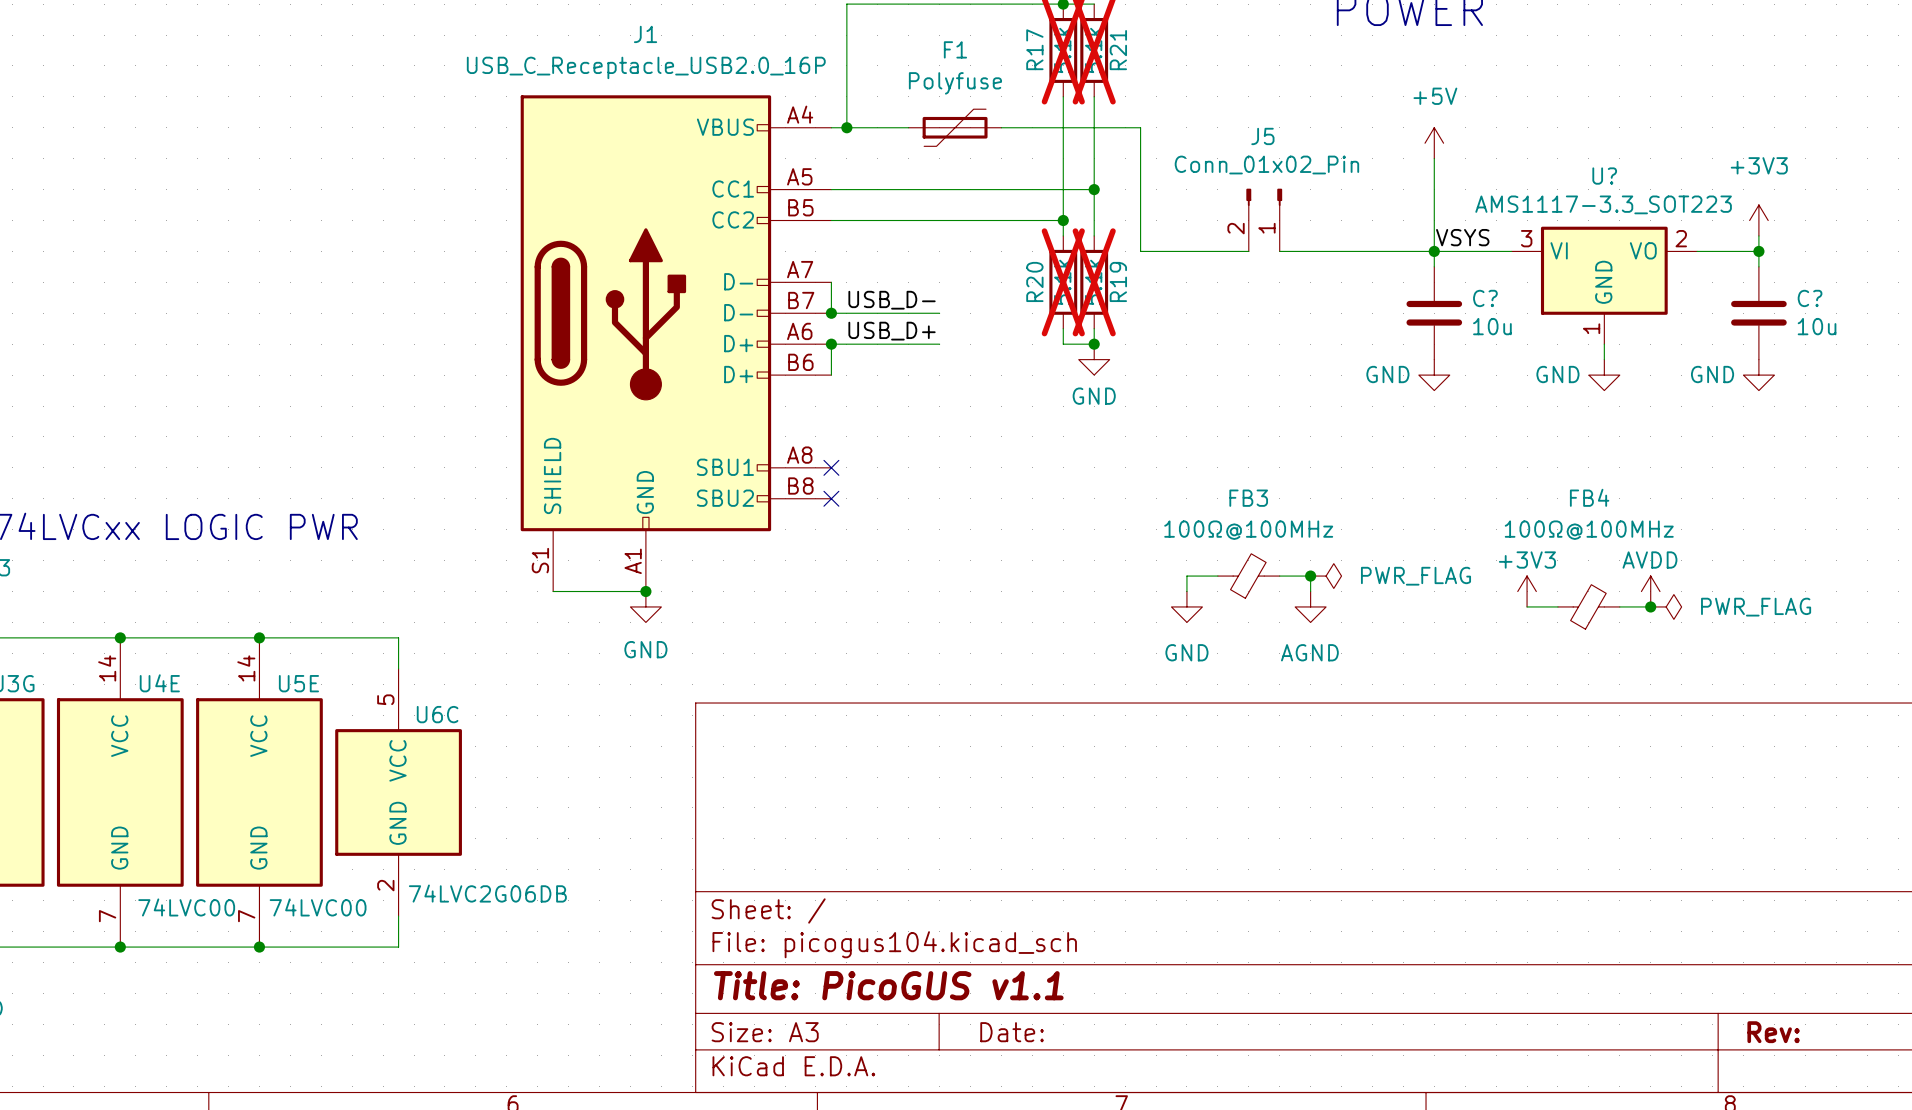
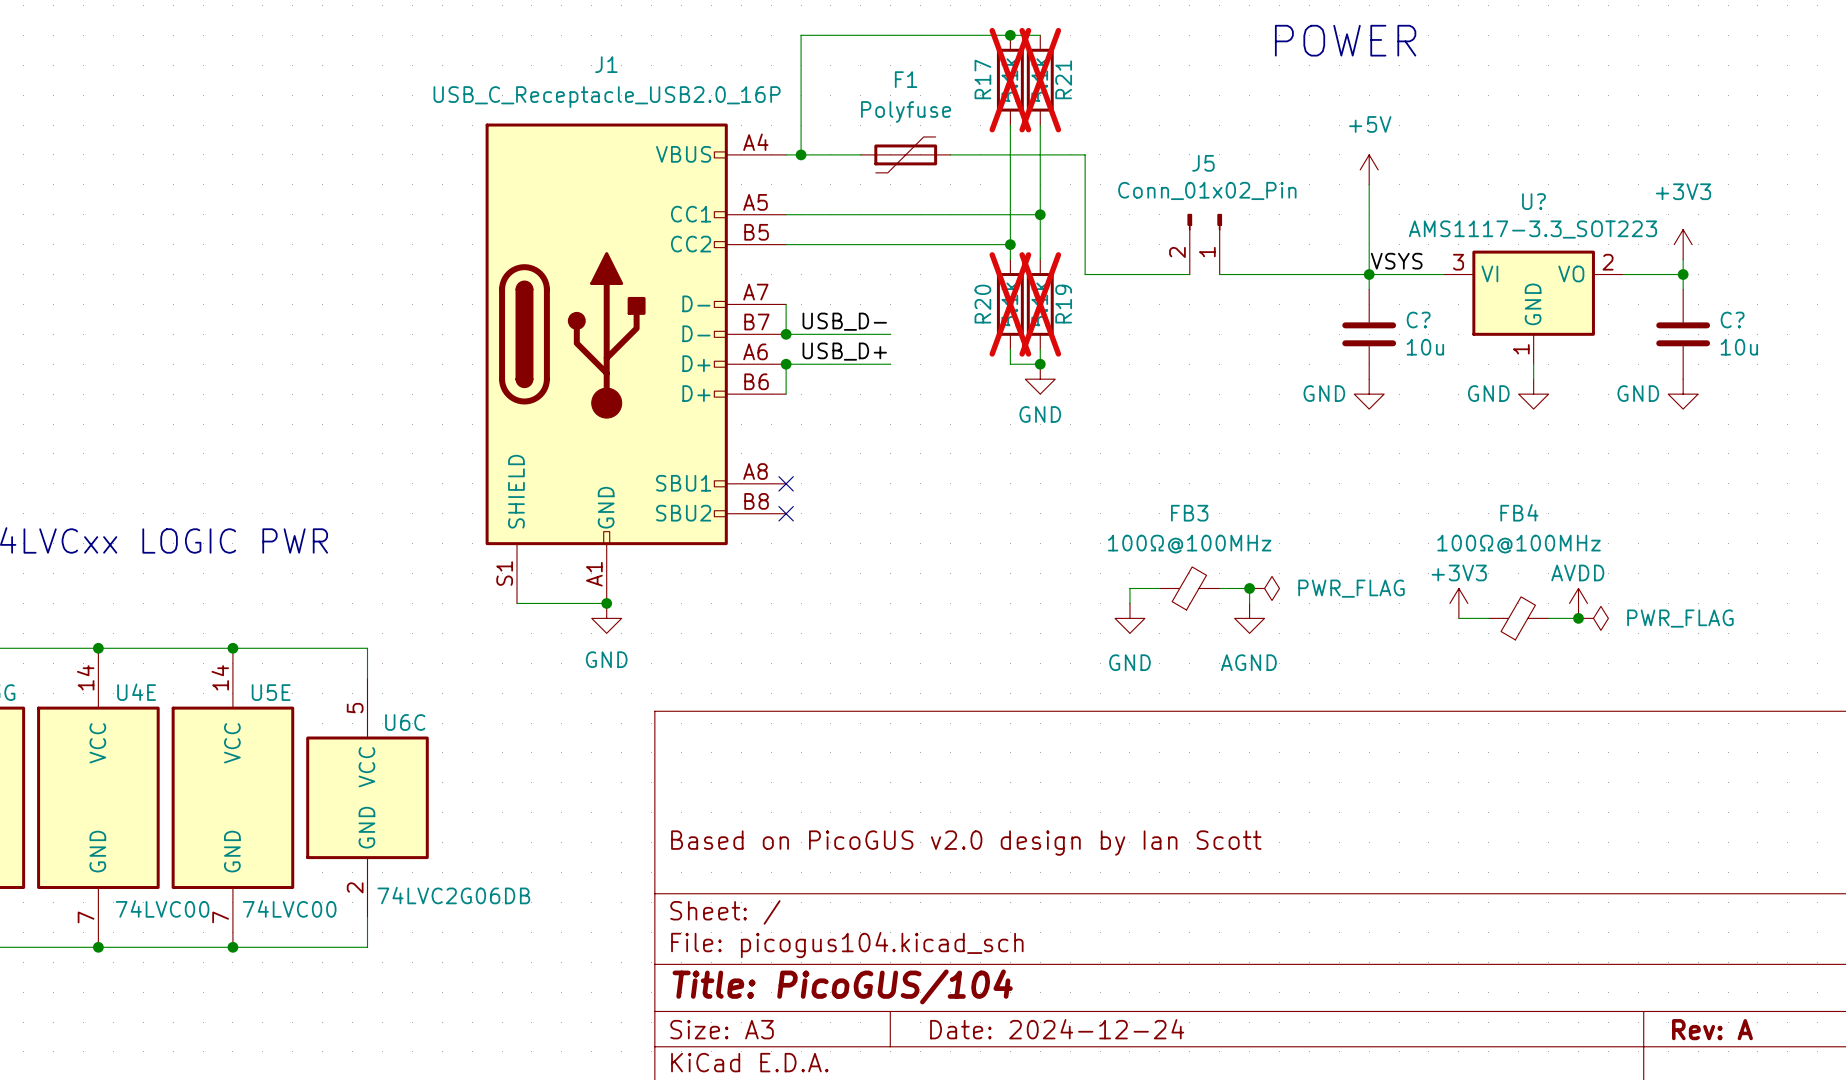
title block: none -> Based on PicoGUS v2.0 design by Ian Scott (966, 843)
title block: Title: PicoGUS v1.1 (888, 985) -> Title: PicoGUS/104 (842, 986)
title block: Date: (1012, 1032) -> Date: 2024-12-24 (1057, 1029)
title block: Rev: (1773, 1032) -> Rev: A (1712, 1029)

